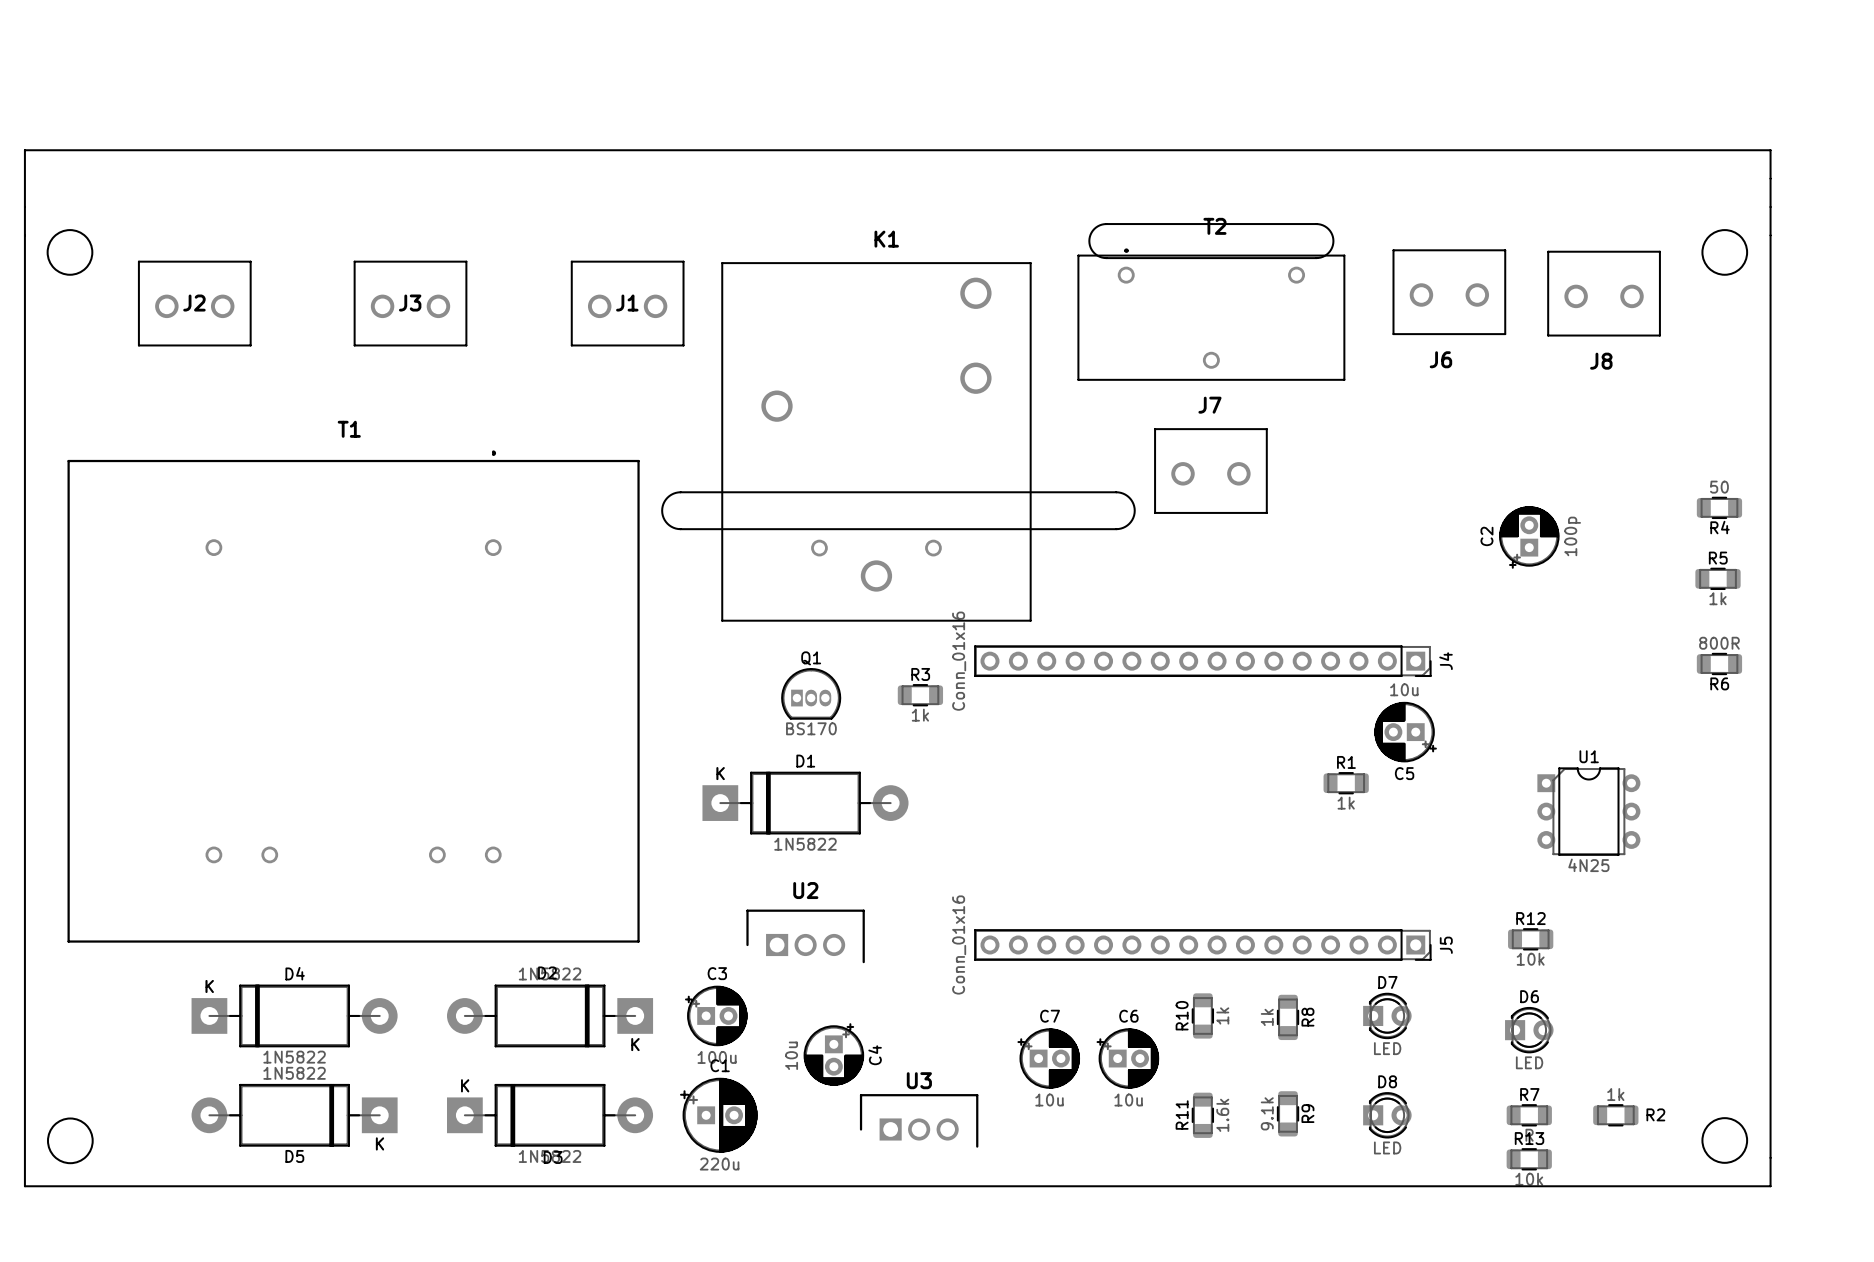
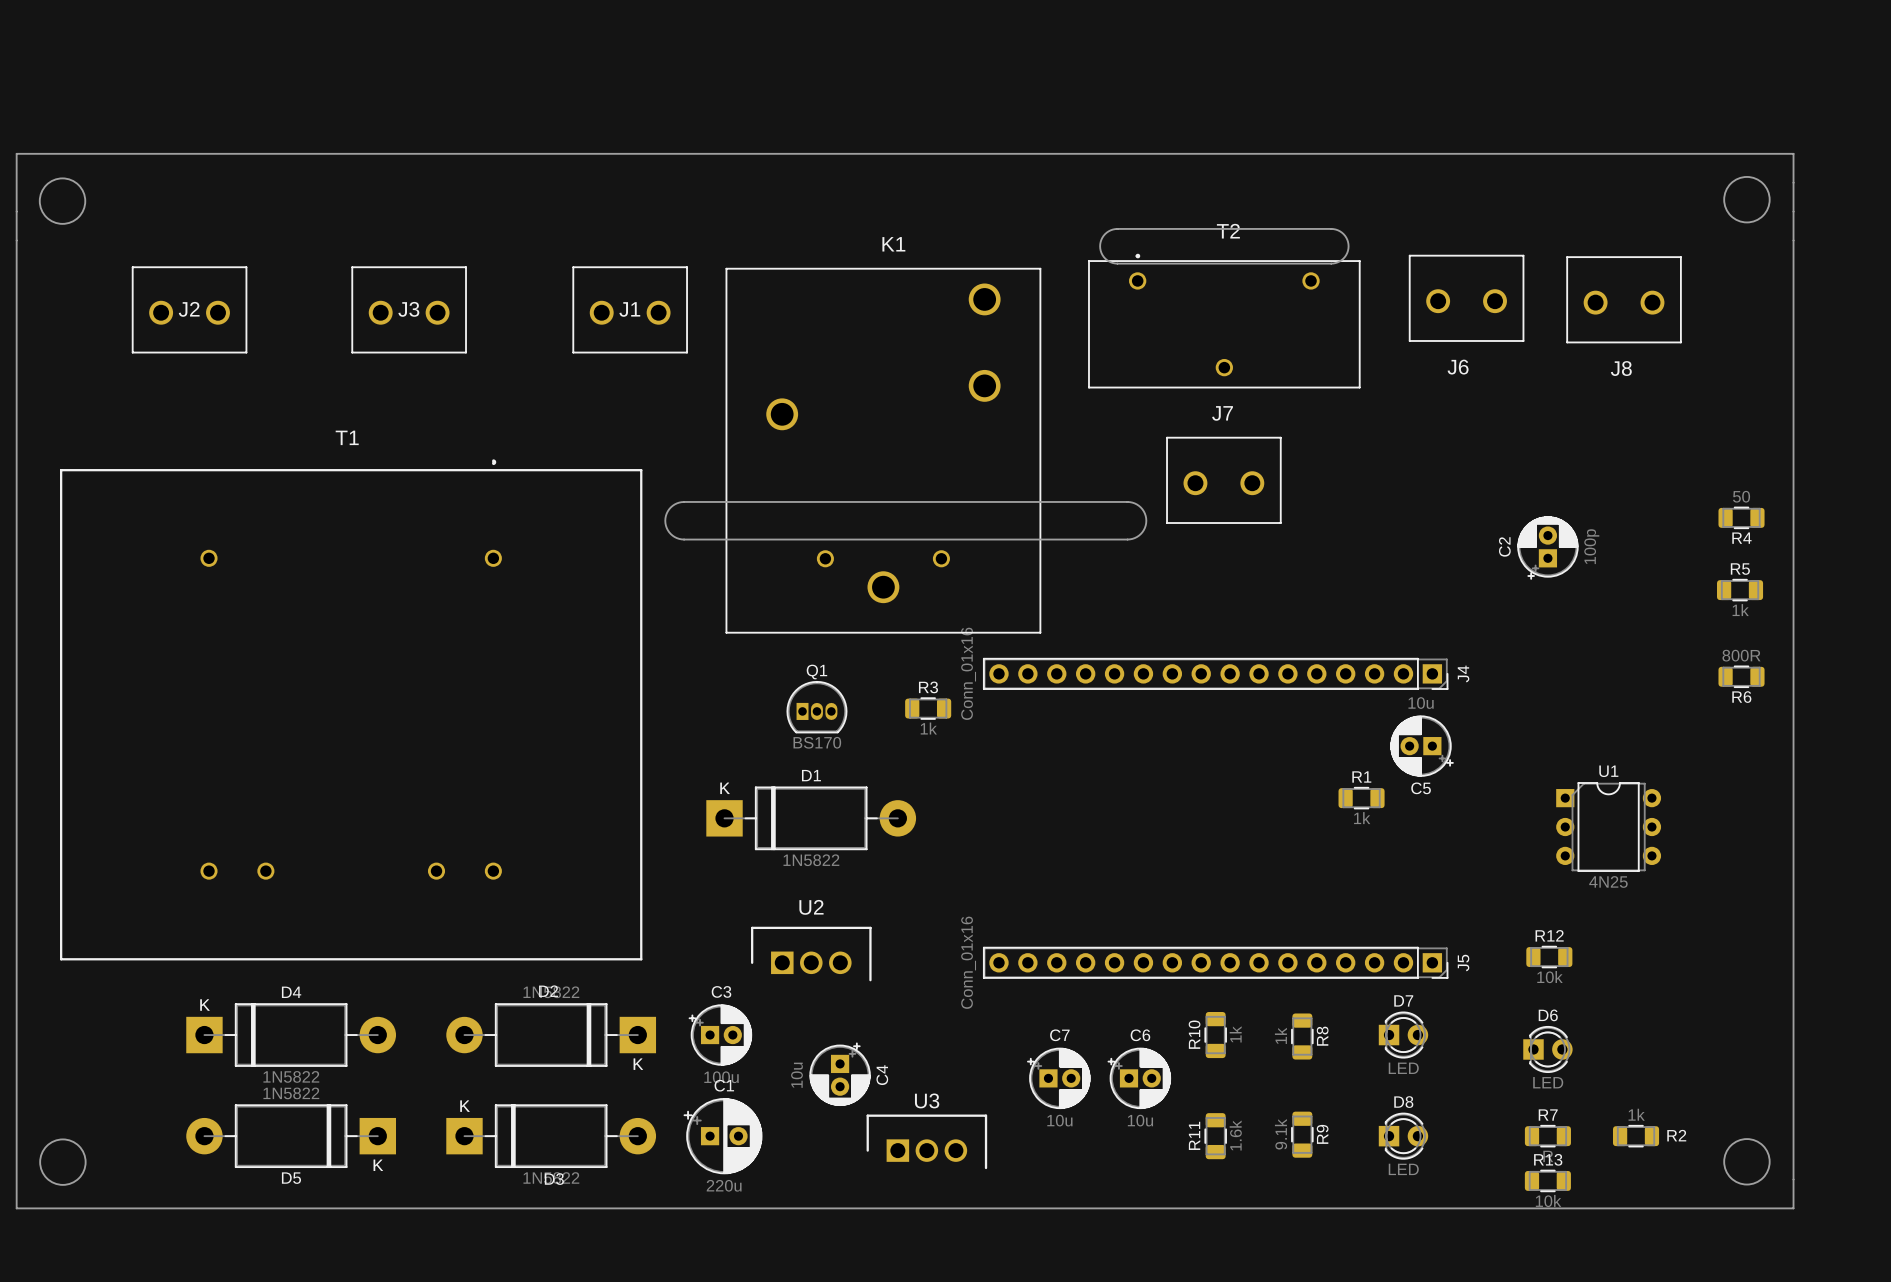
round board edge position: (69, 252) -> (62, 201)
round board edge position: (1724, 252) -> (1746, 199)

